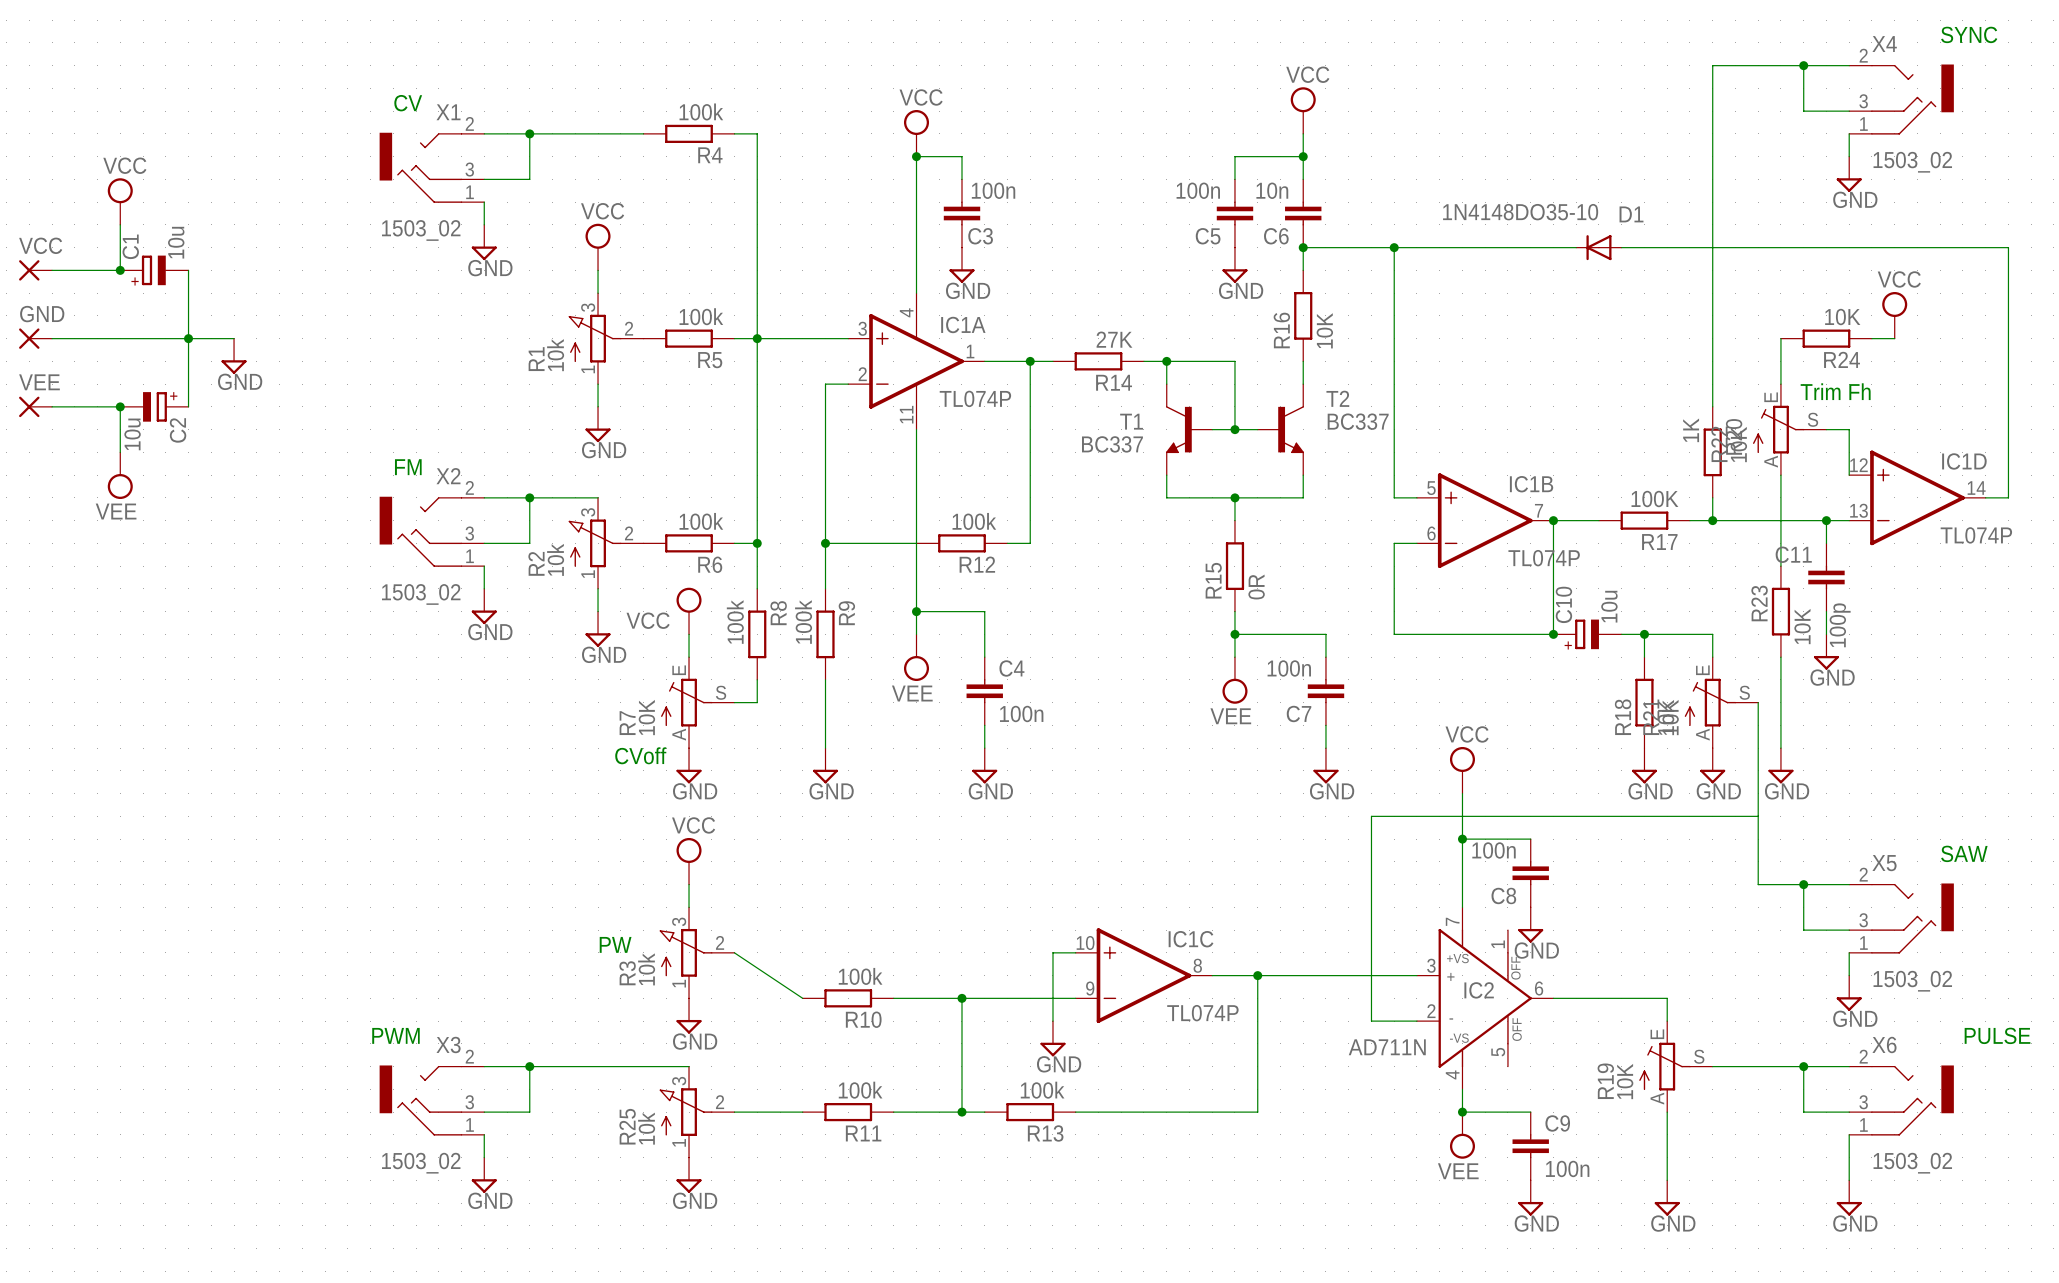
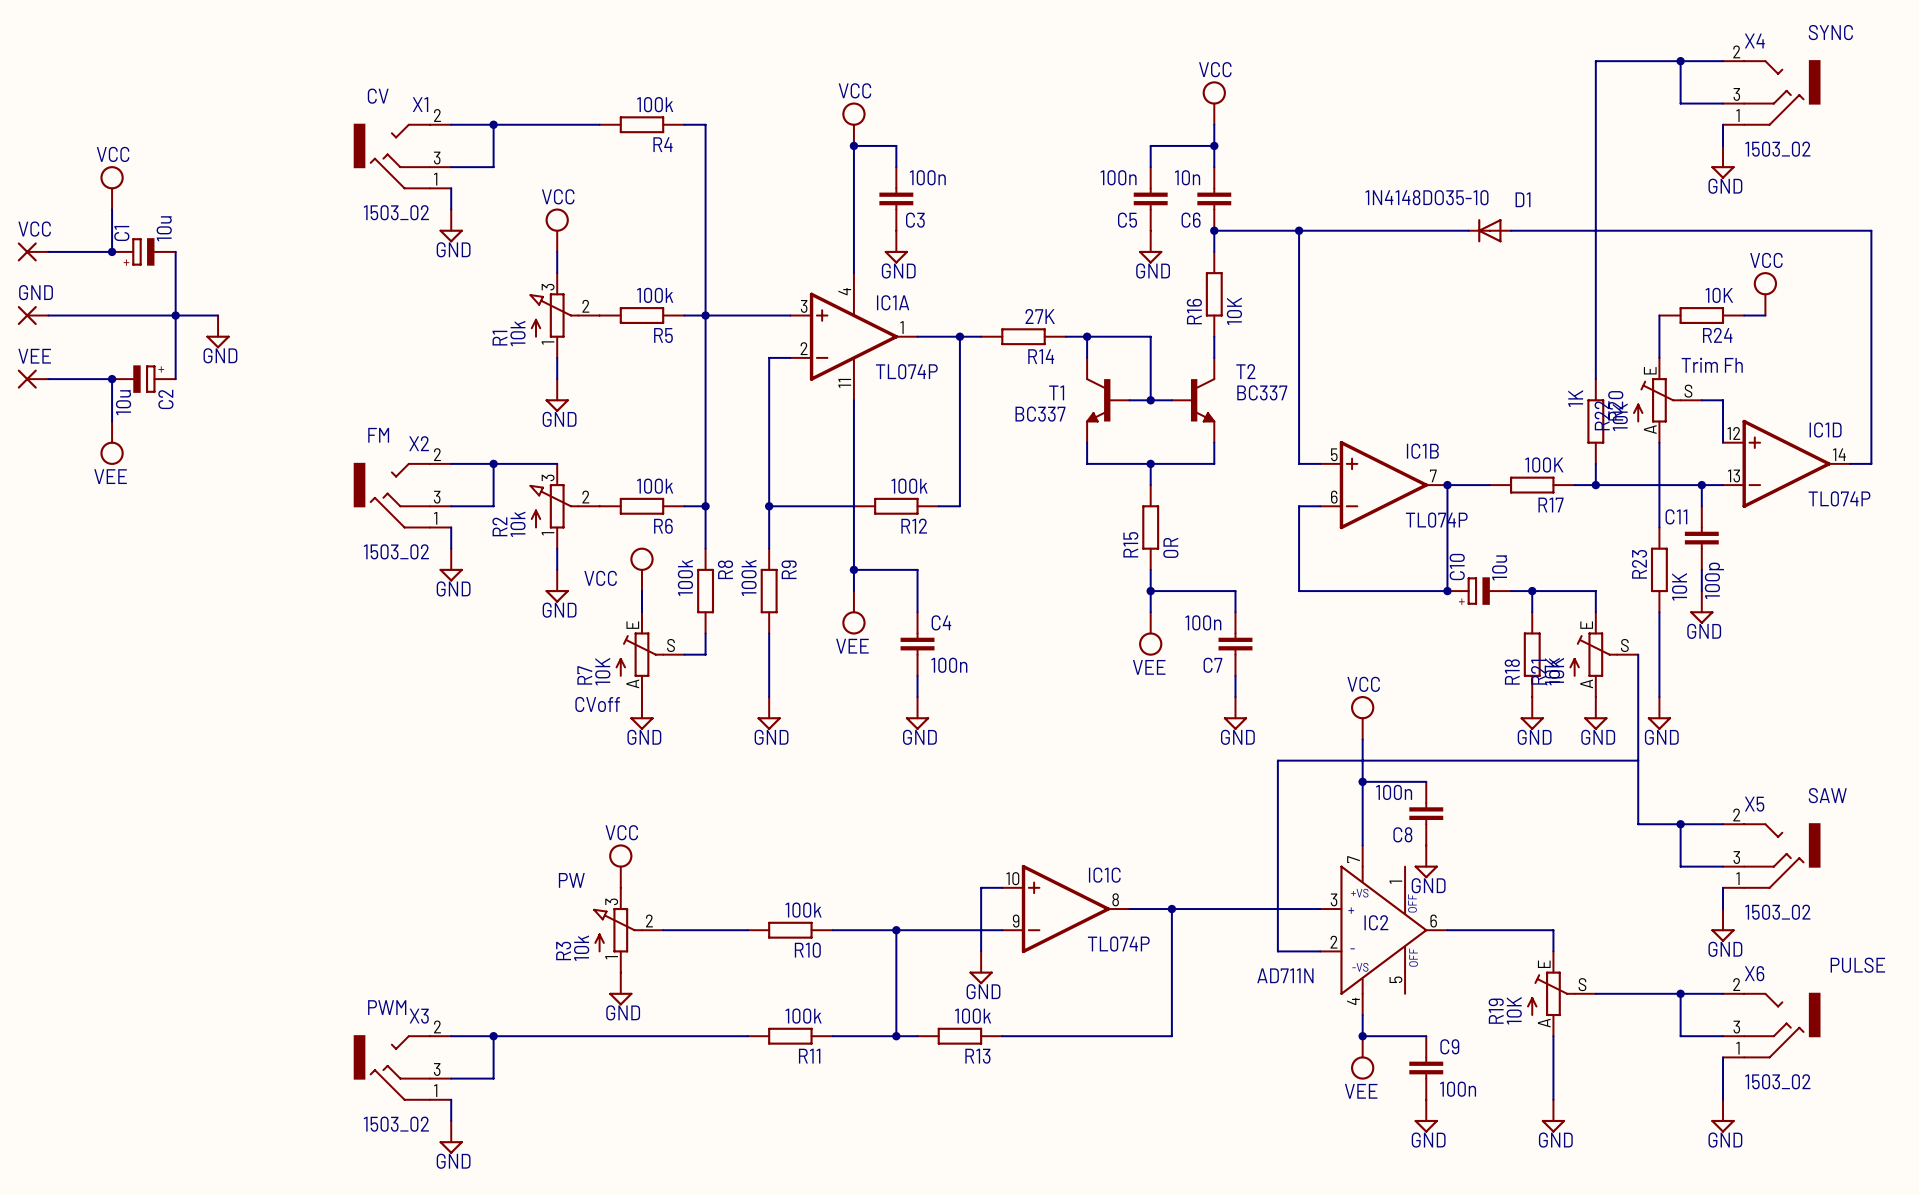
power symbol position: VCC (689, 861) -> VCC (620, 866)
wire: (689, 884) (689, 907) -> none
R3 position: (697, 952) -> (628, 930)
wire: (734, 952) (802, 998) -> (663, 930) (747, 930)
power symbol position: GND (689, 1015) -> GND (620, 989)
text position: PWM (395, 1035) -> PWM (387, 1007)
wire: (484, 1066) (689, 1066) -> none
wire: (529, 1066) (529, 1112) -> none
junction position: (529, 1066) -> (493, 1036)
X3 position: (431, 1100) -> (402, 1067)
R25: 10k (697, 1112) -> none
wire: (484, 1134) (484, 1157) -> (684, 1036) (493, 1036) (493, 1078) (451, 1078)
power symbol position: GND (484, 1175) -> GND (451, 1137)
power symbol: GND (689, 1175) -> none
wire: none -> (451, 1099) (451, 1120)

